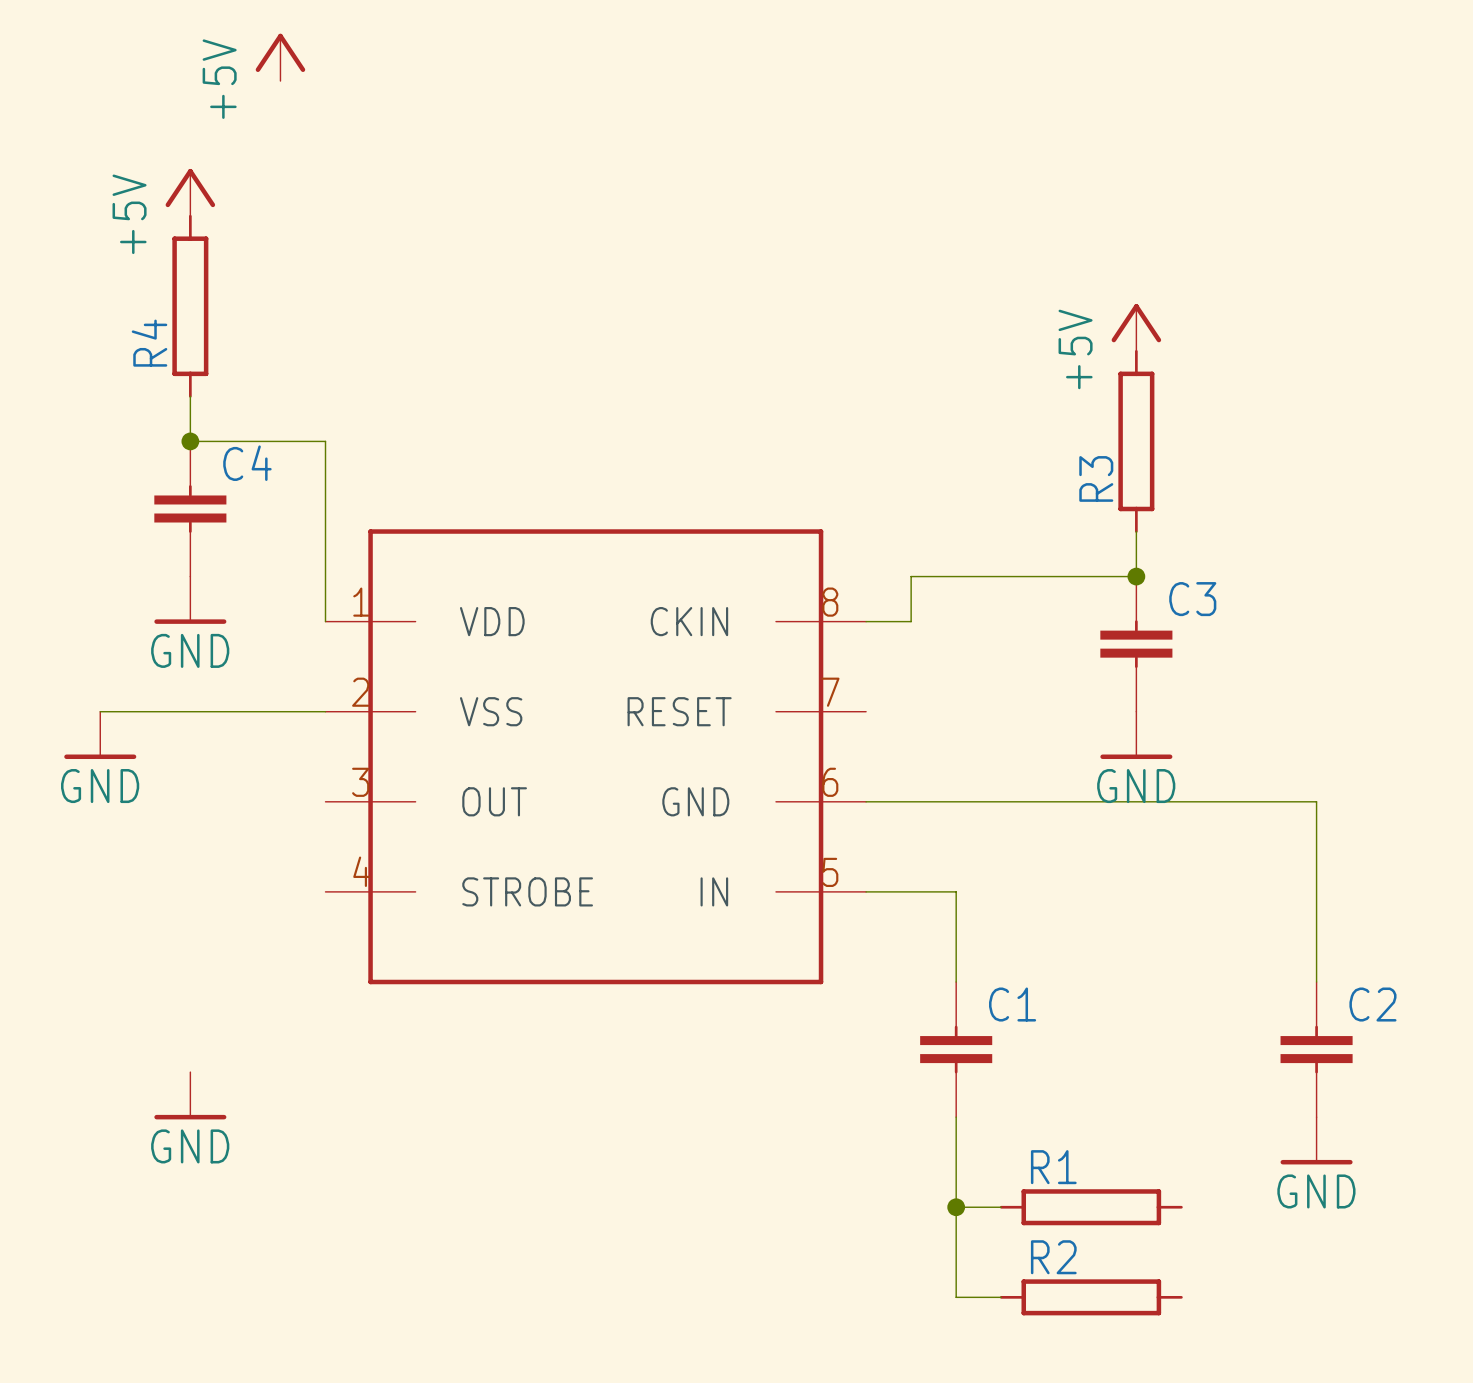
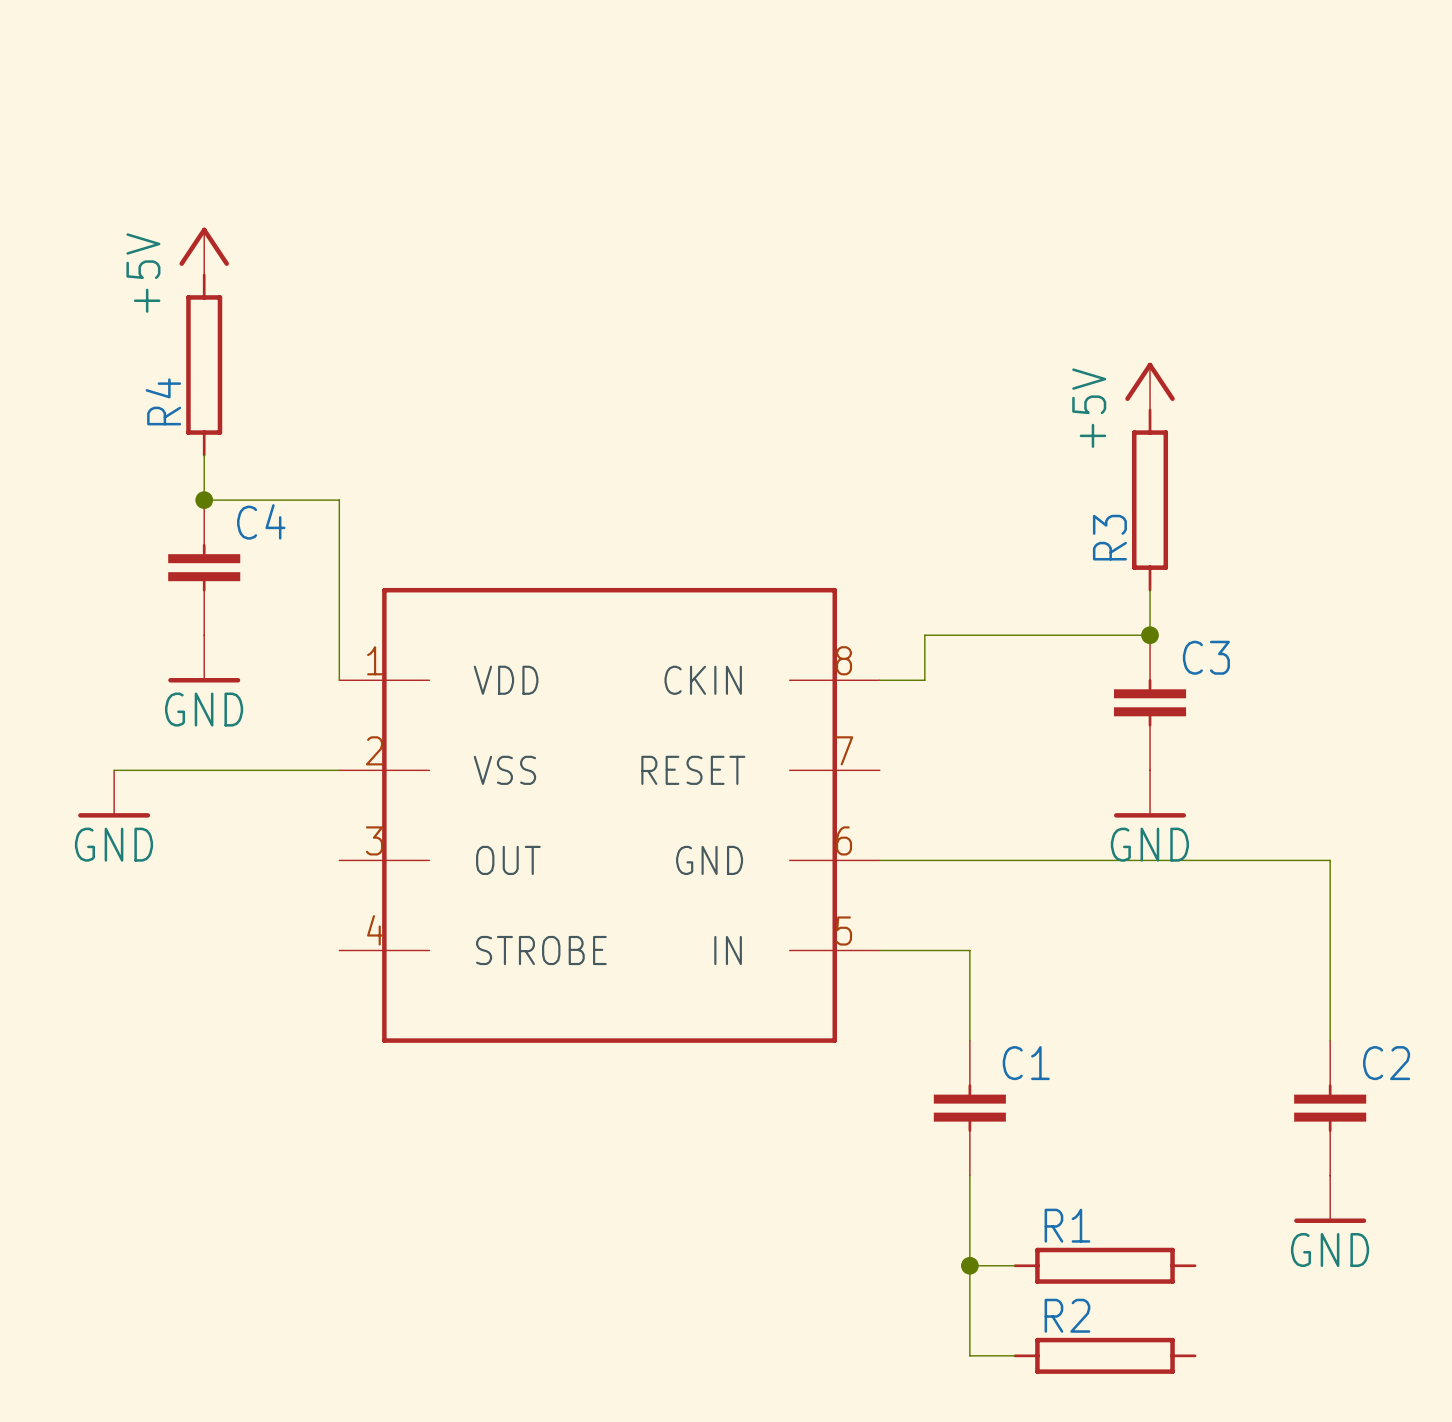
power symbol: +5V (280, 57) -> none
power symbol: GND (190, 1095) -> none

